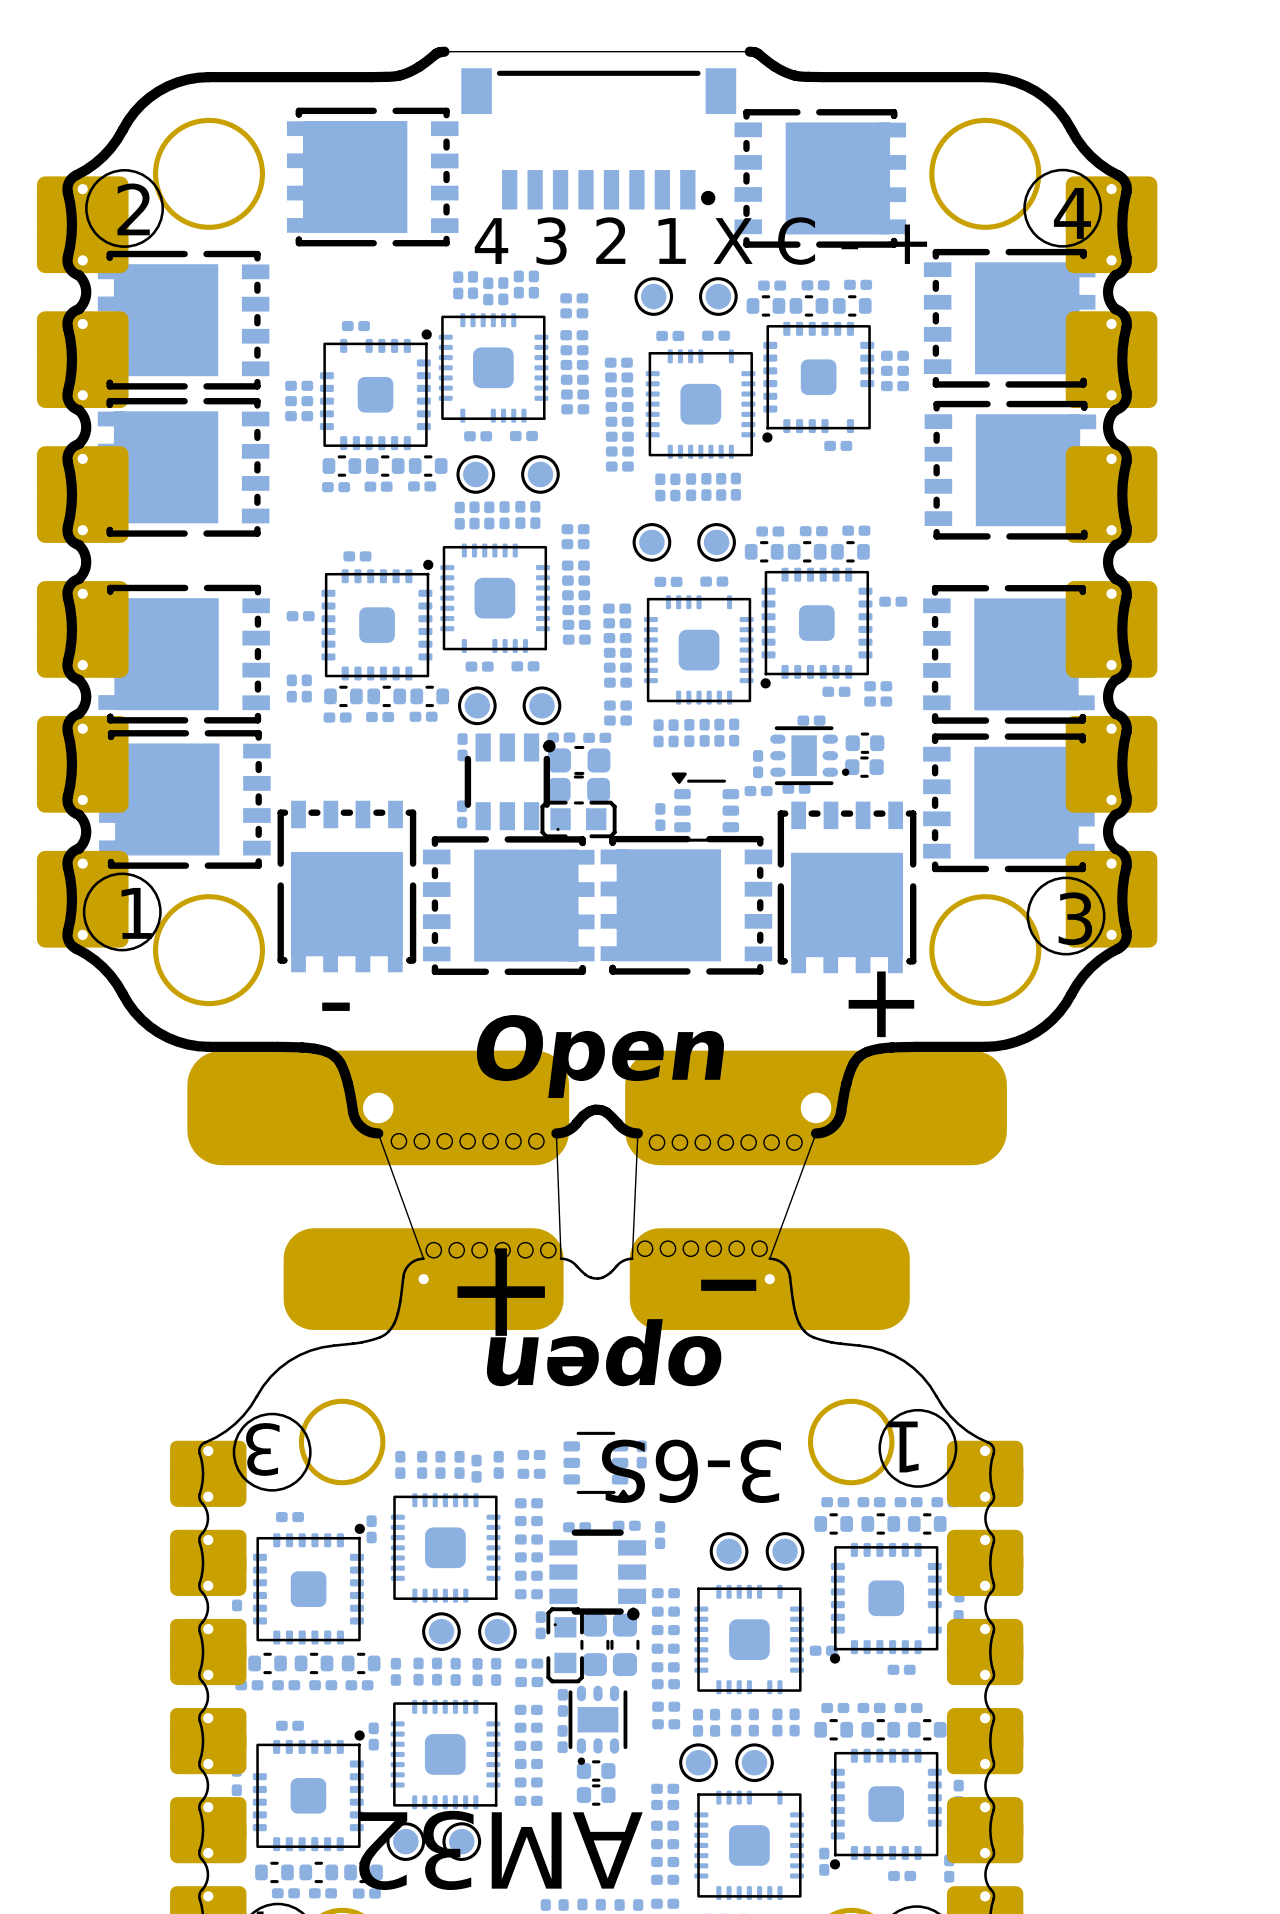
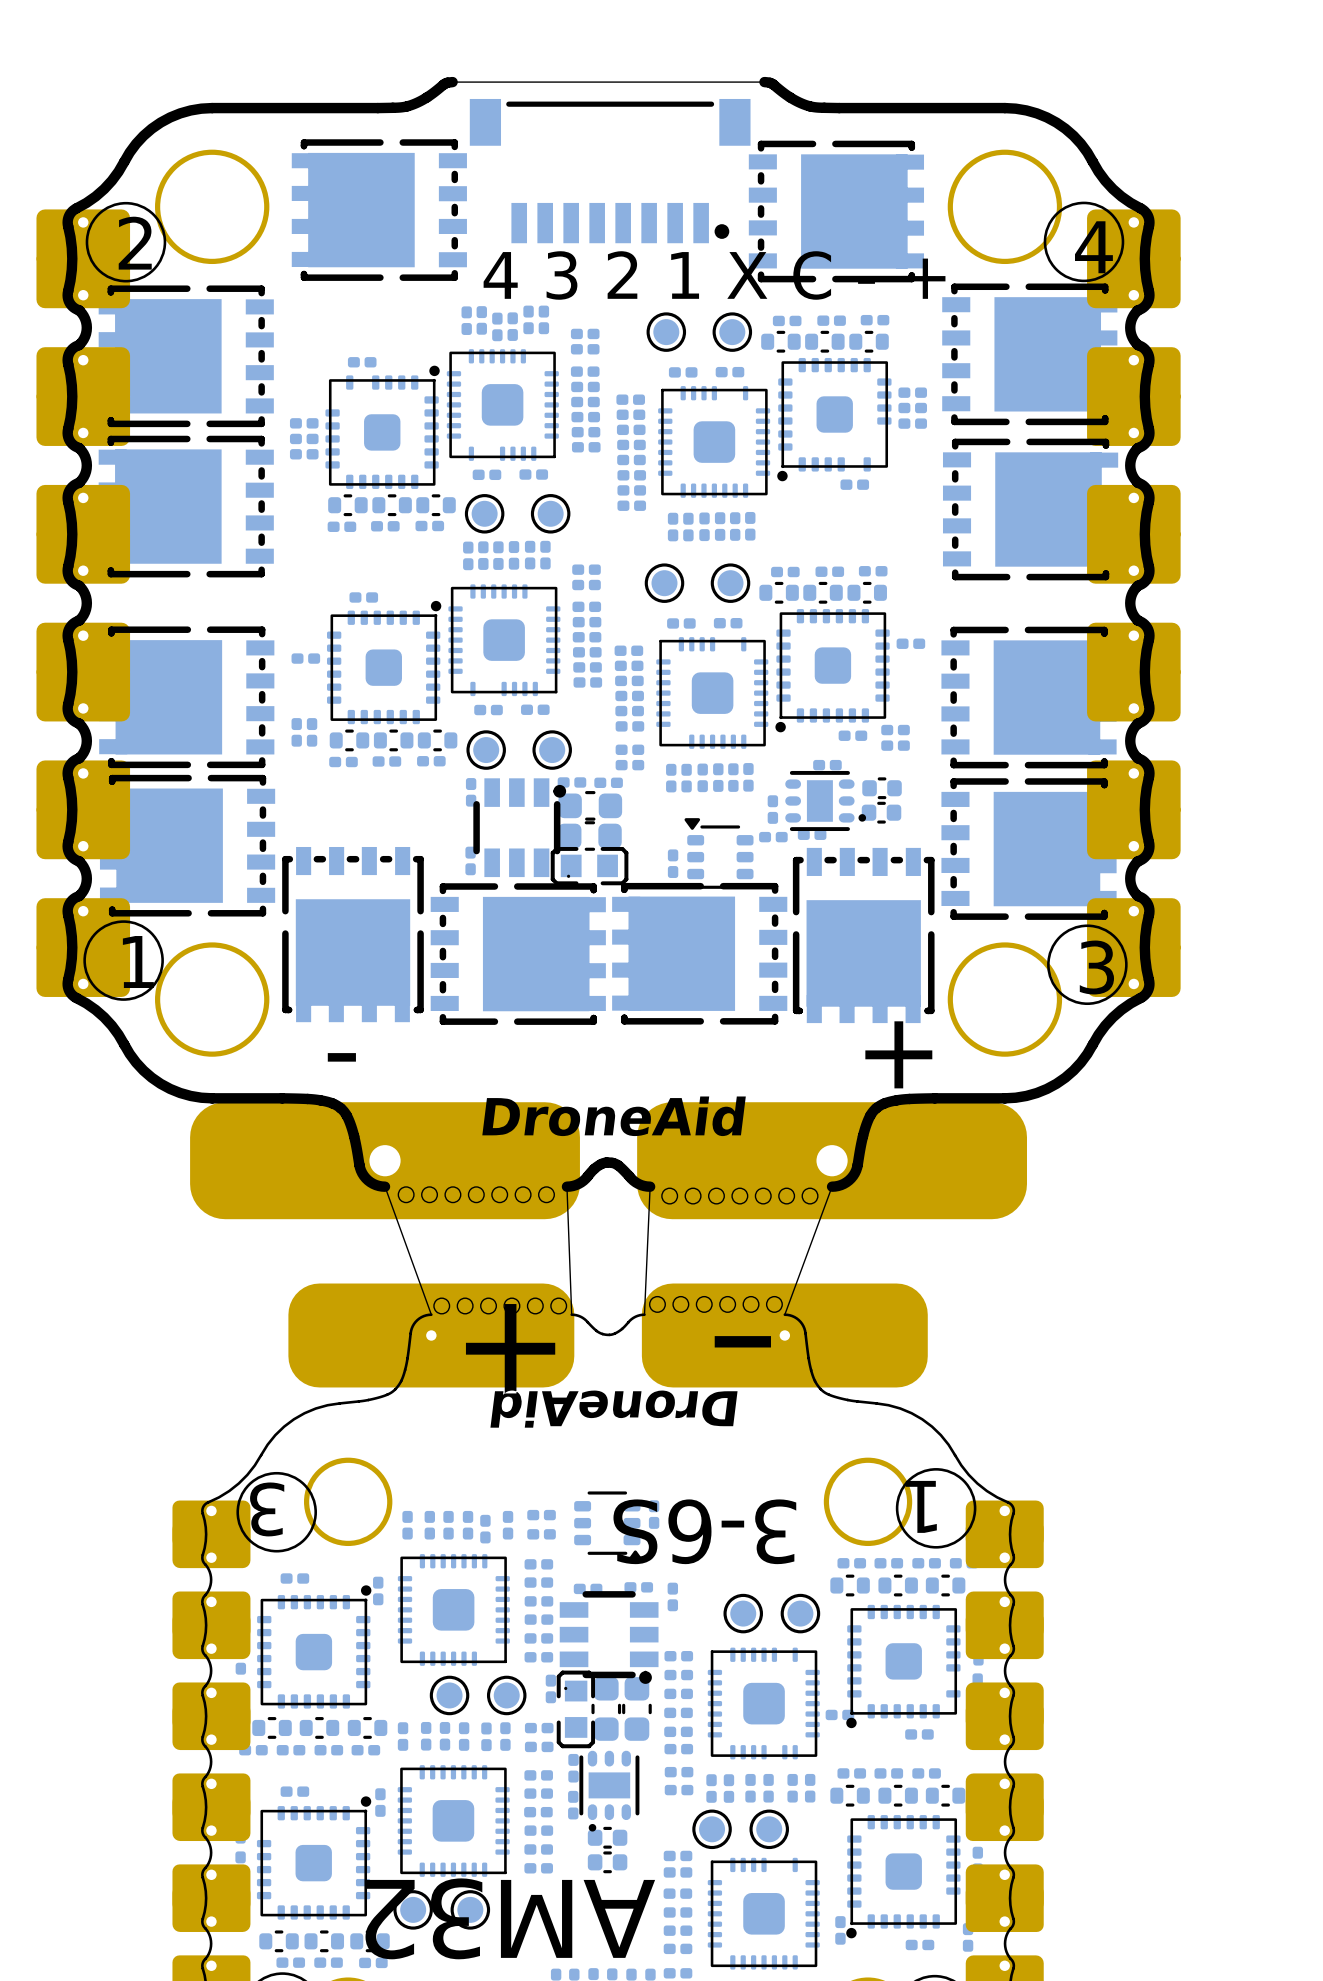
text: Open (600, 1056) -> DroneAid (614, 1116)
text: open (604, 1352) -> DroneAid (613, 1409)

